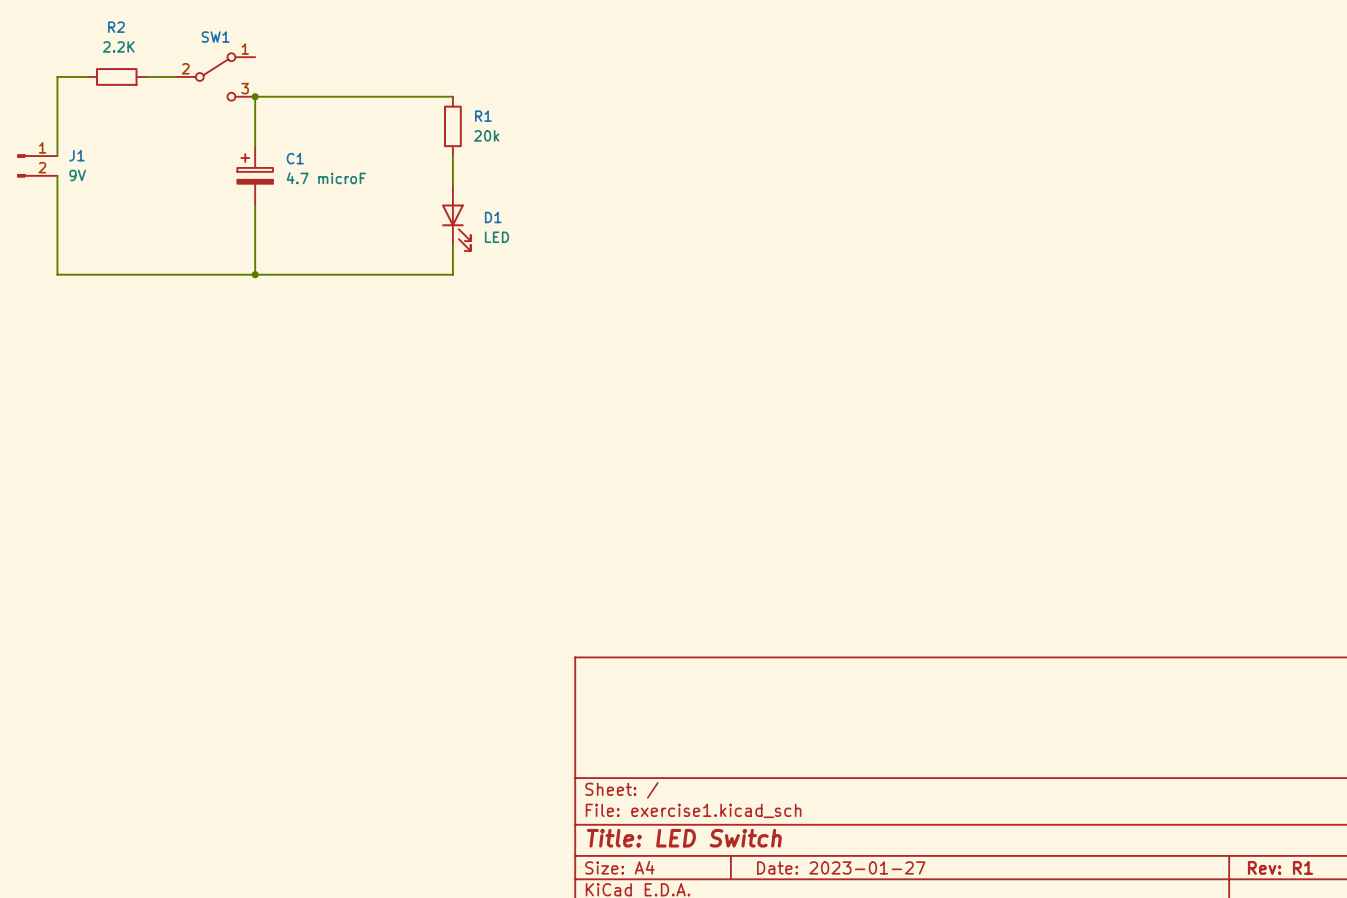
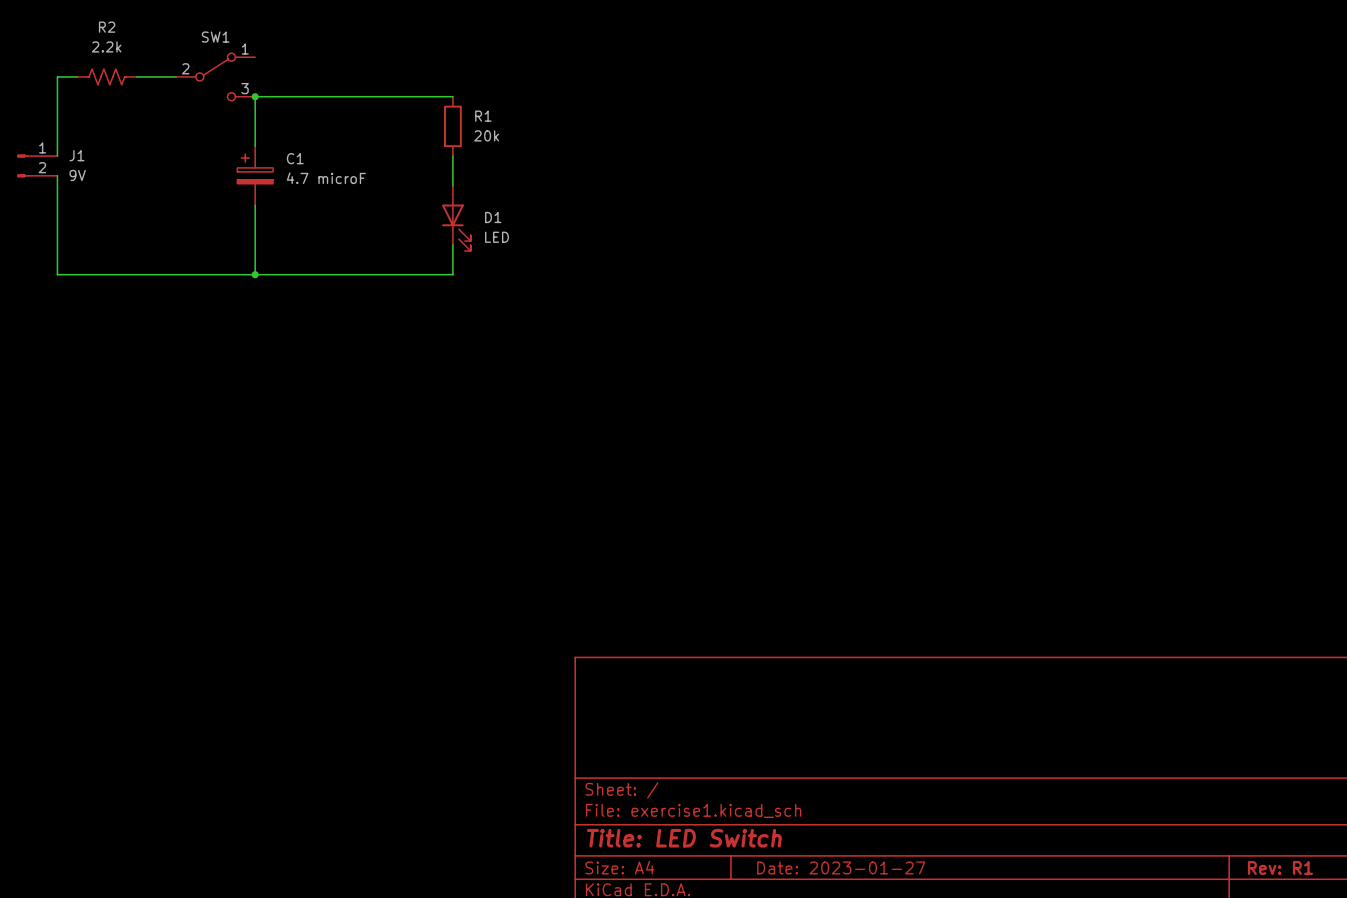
R2 value: 2.2K (118, 46) -> 2.2k (106, 46)
R2 symbol: [87, 68, 147, 86] -> [77, 69, 137, 85]

